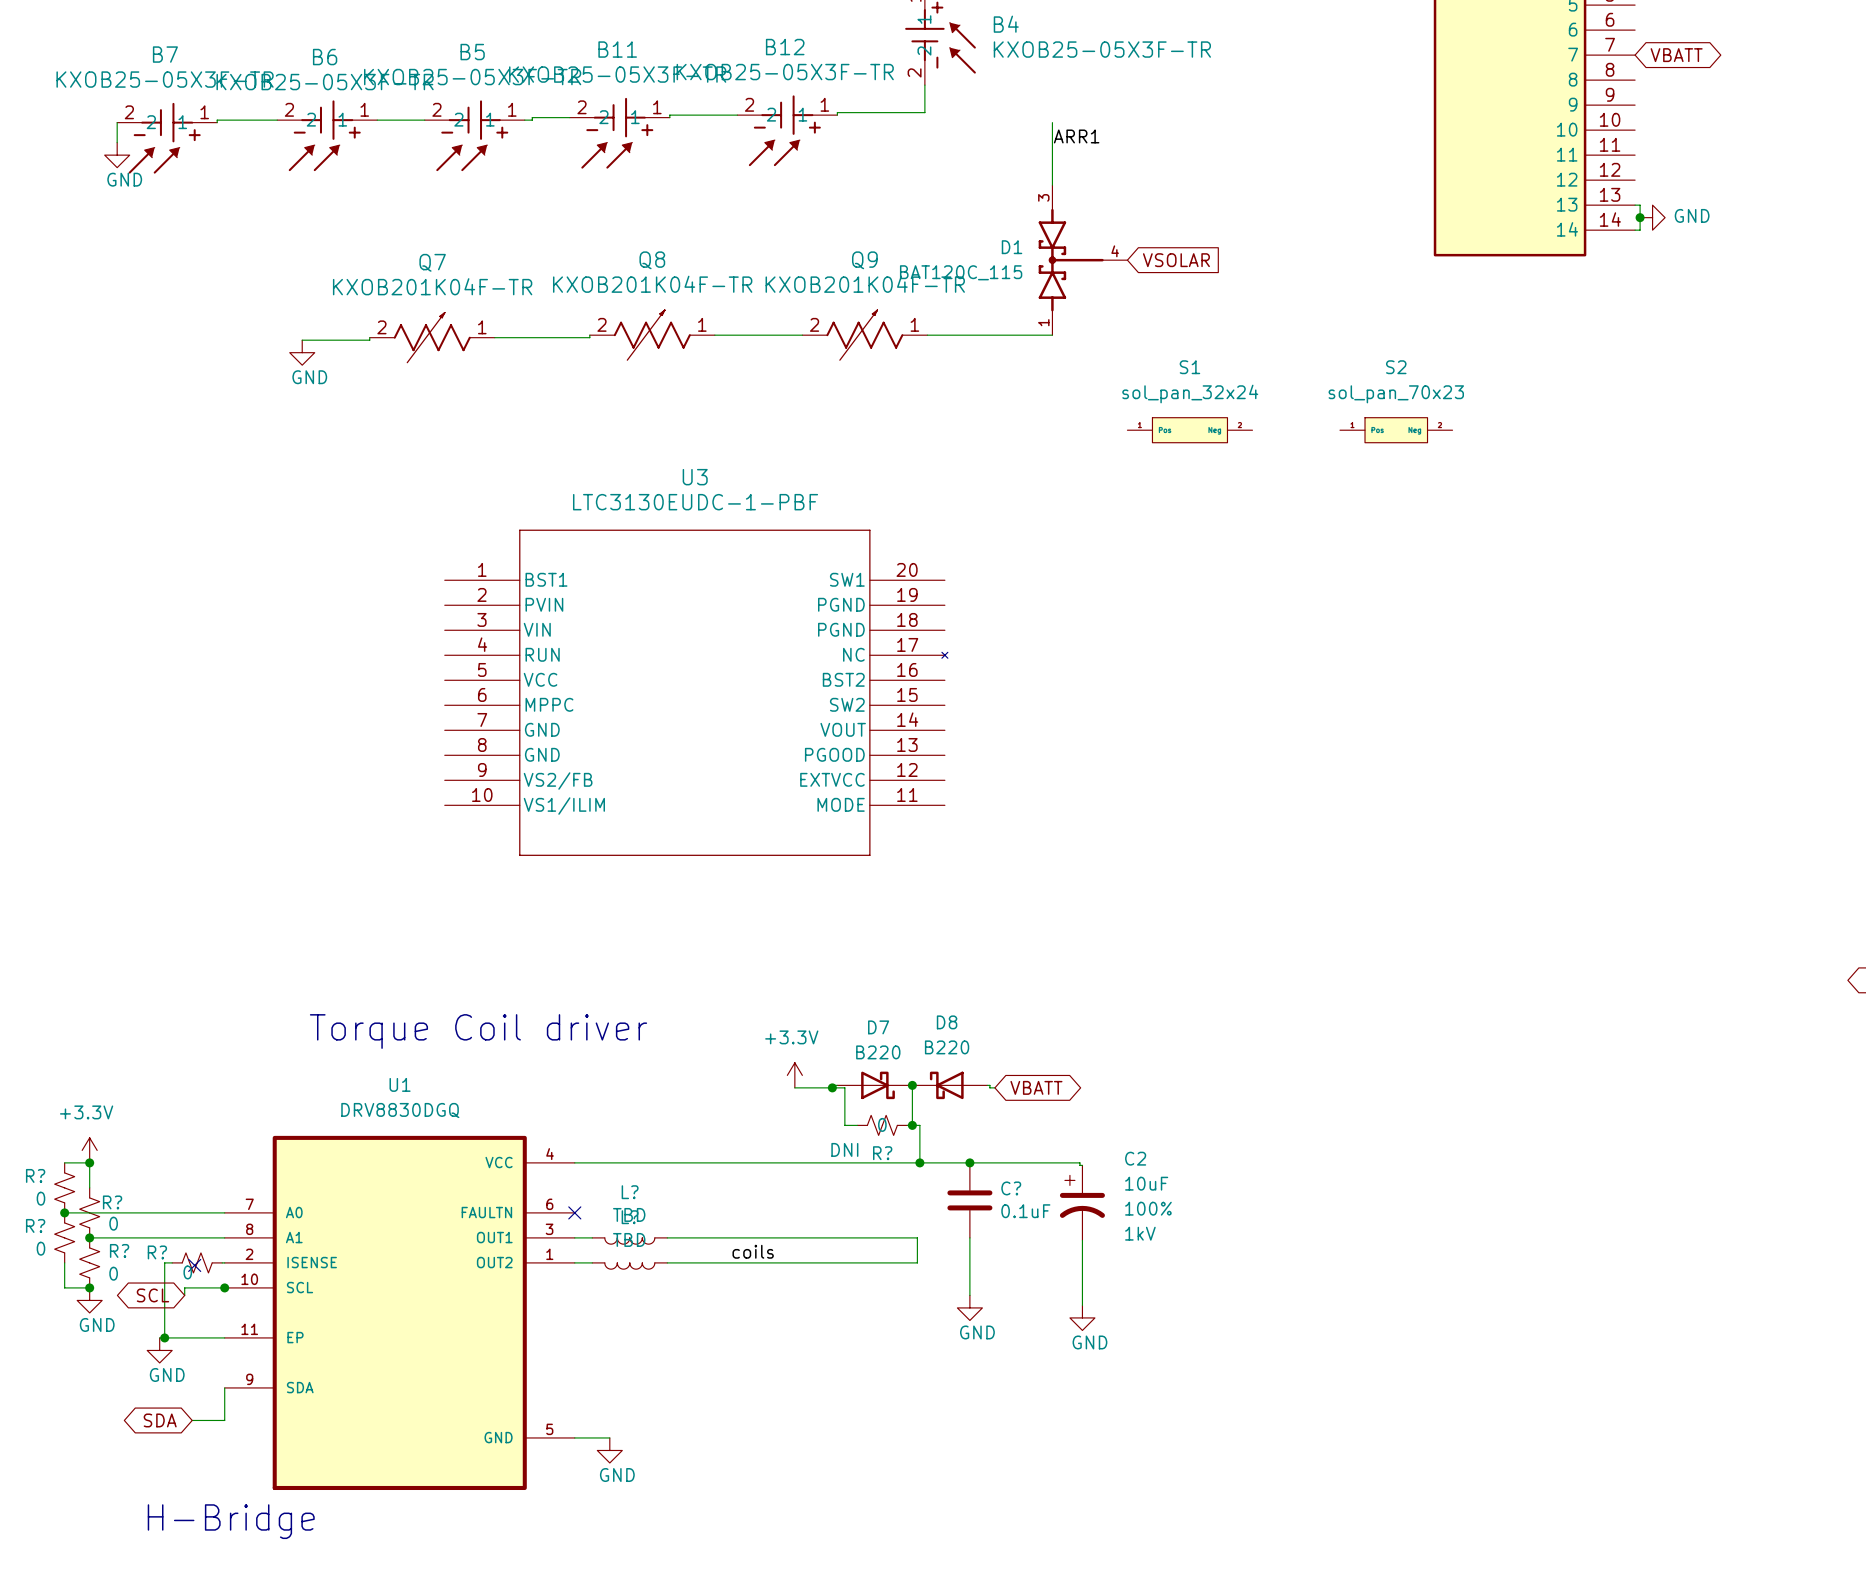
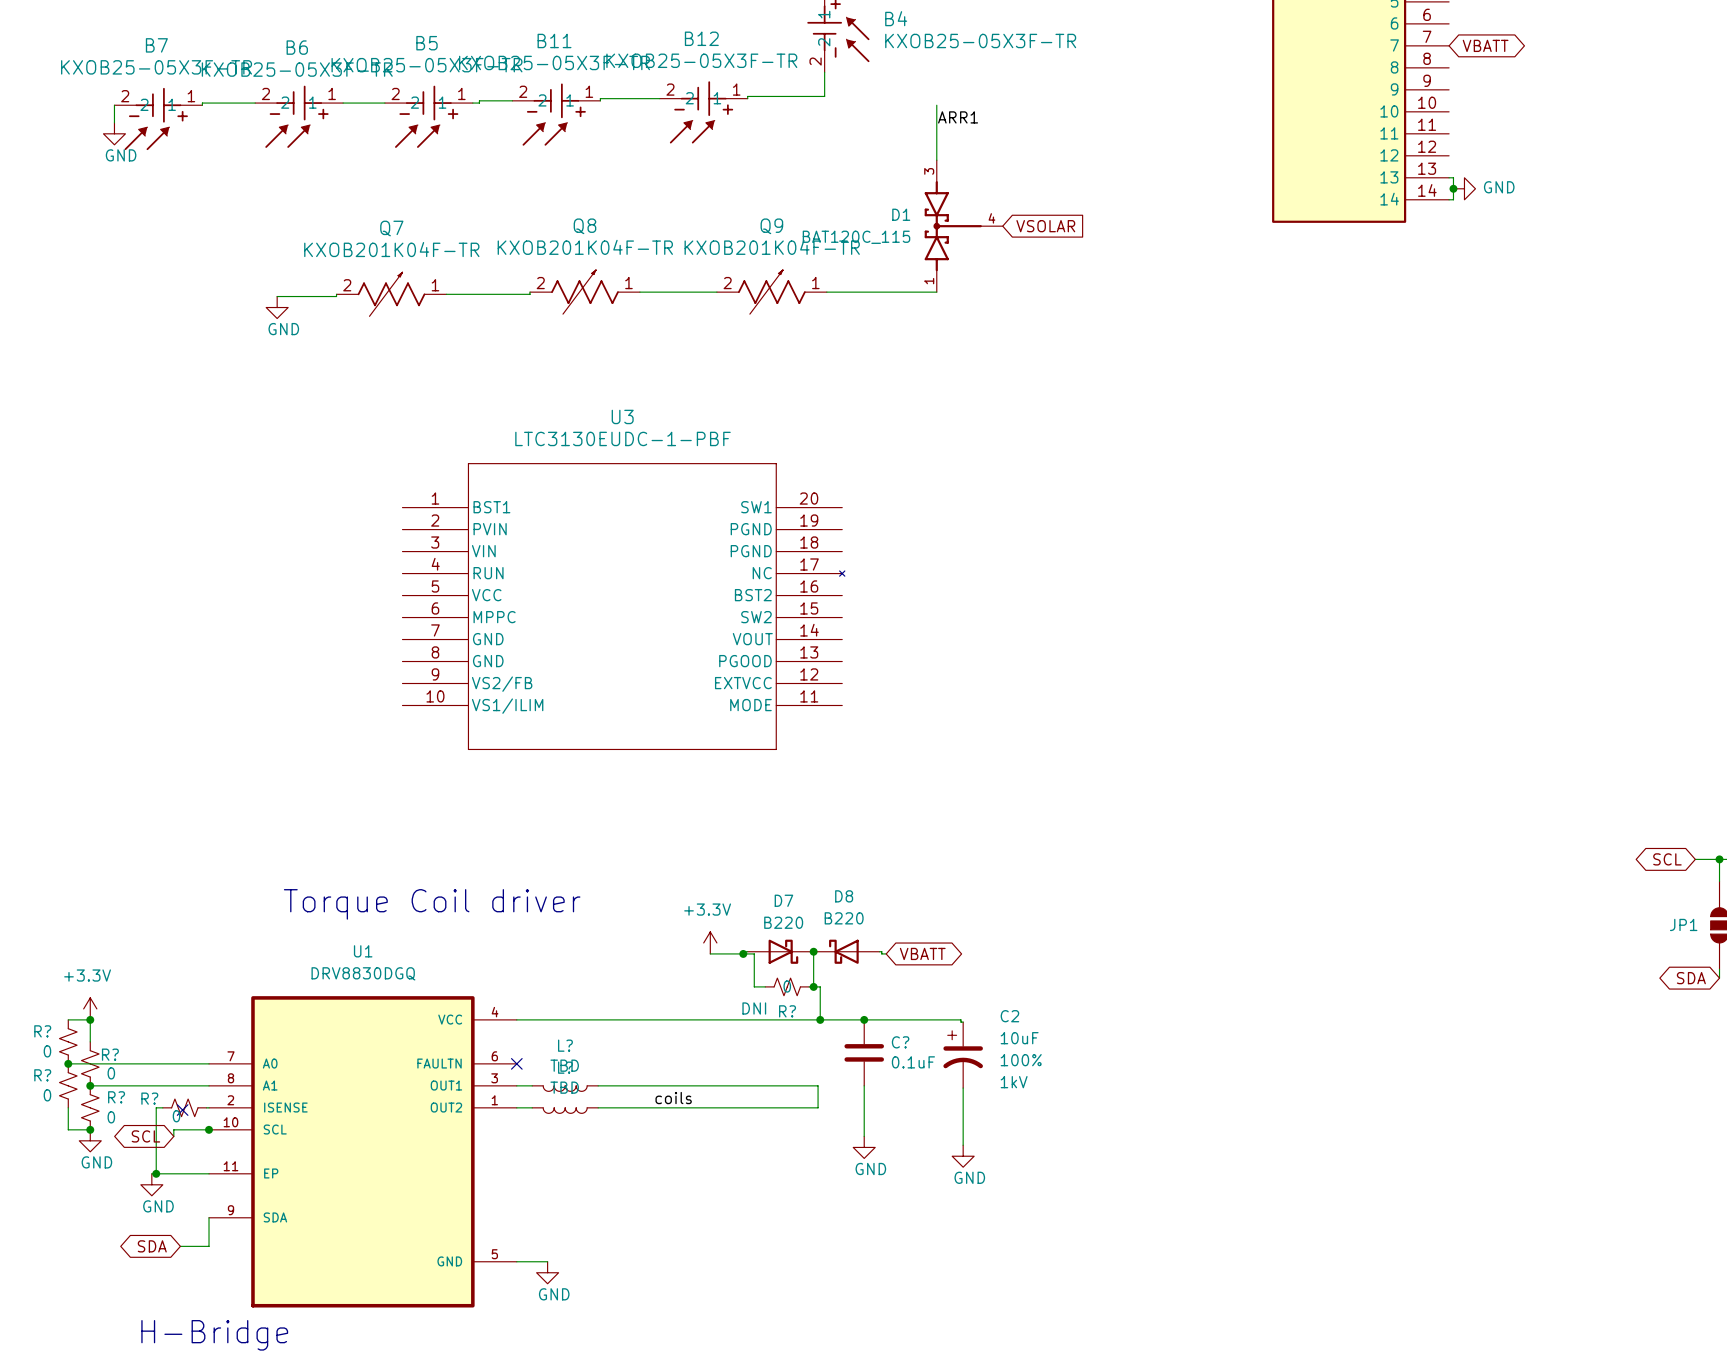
S1: sol_pan_32x24 (1189, 430) -> none
S2: sol_pan_70x23 (1396, 430) -> none

